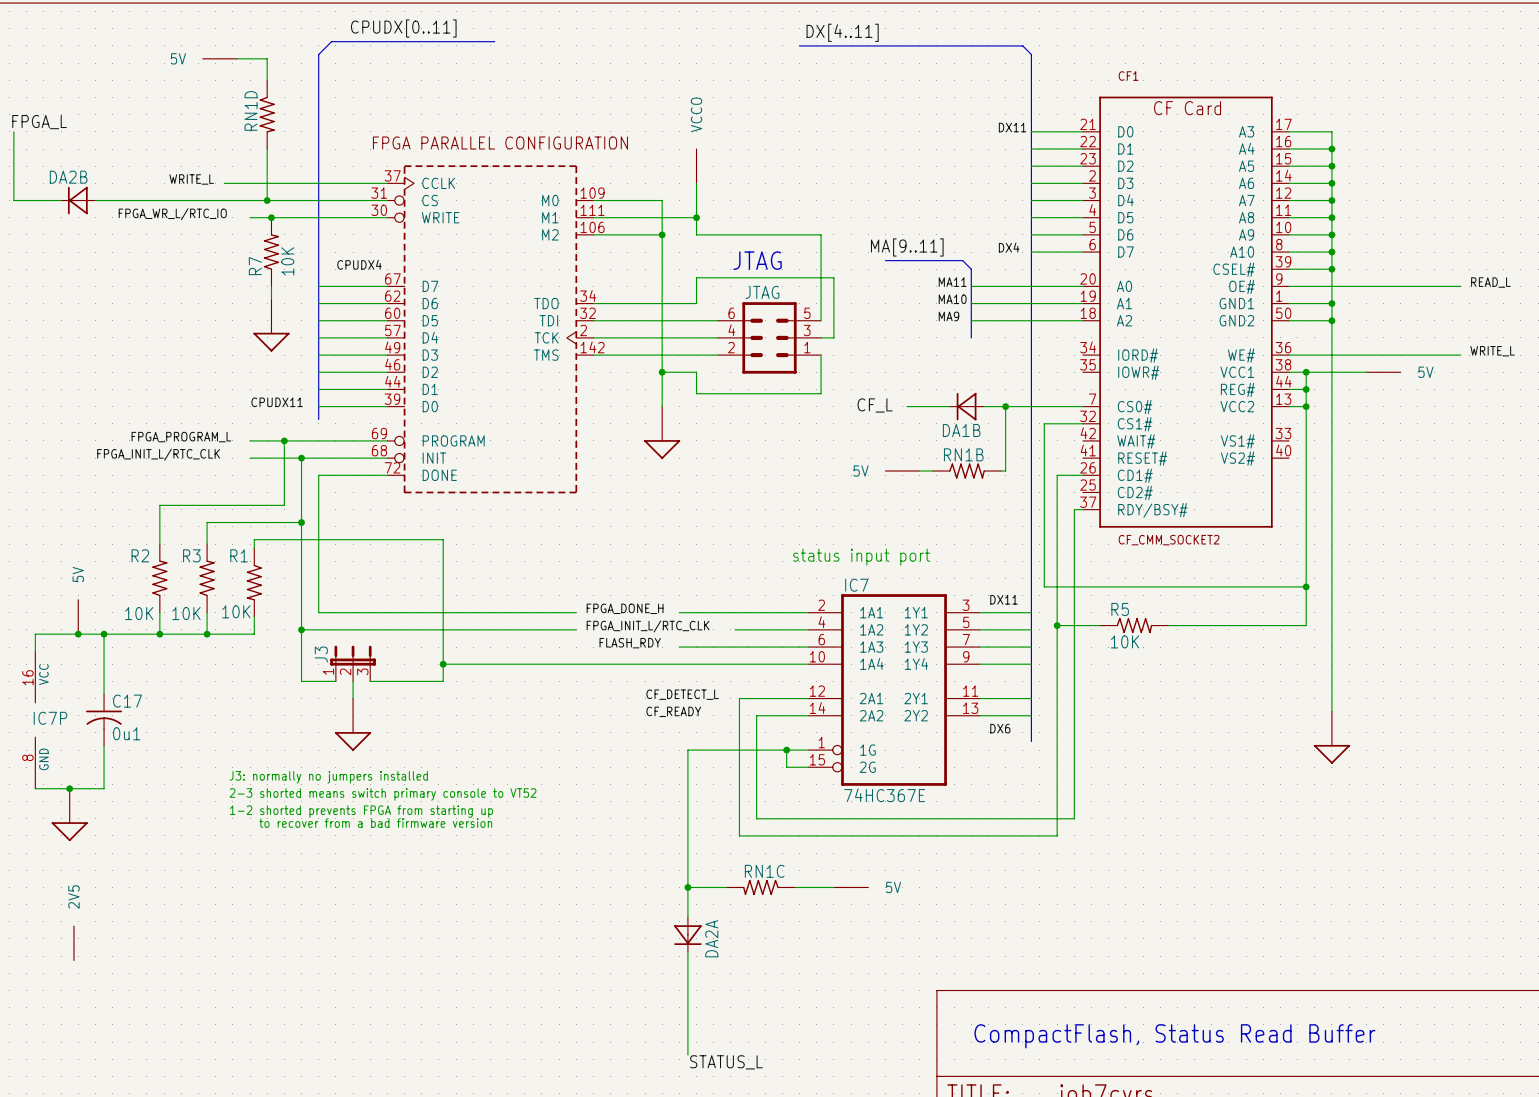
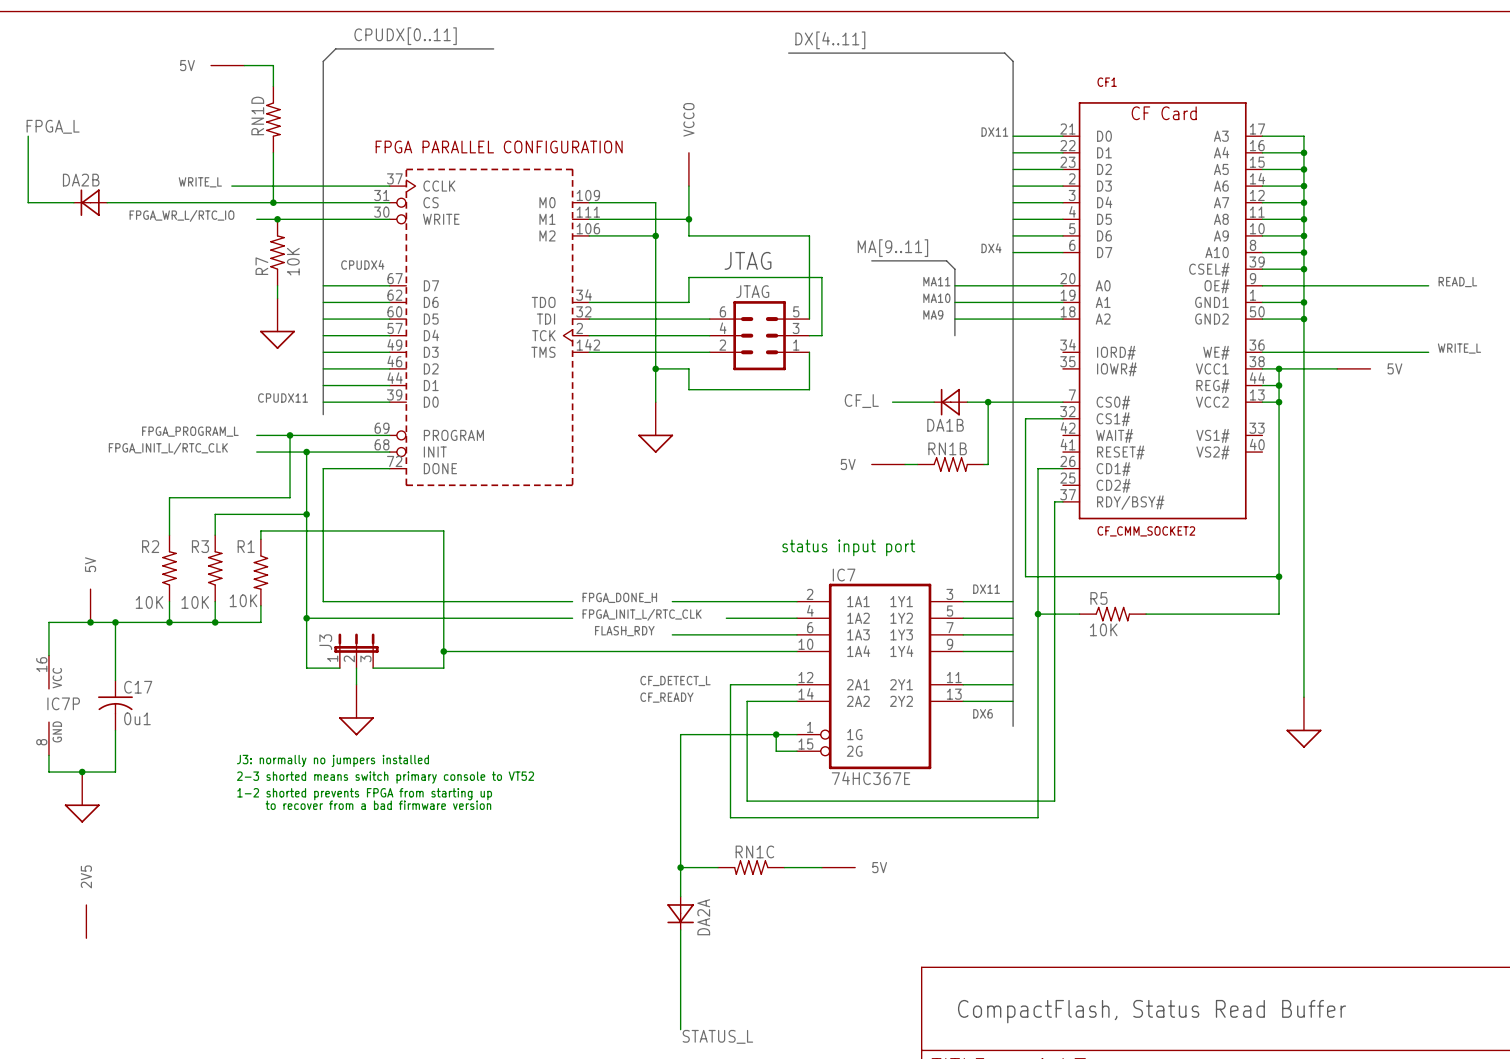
IC7P symbol: [35, 651, 36, 789] -> [48, 655, 49, 756]

